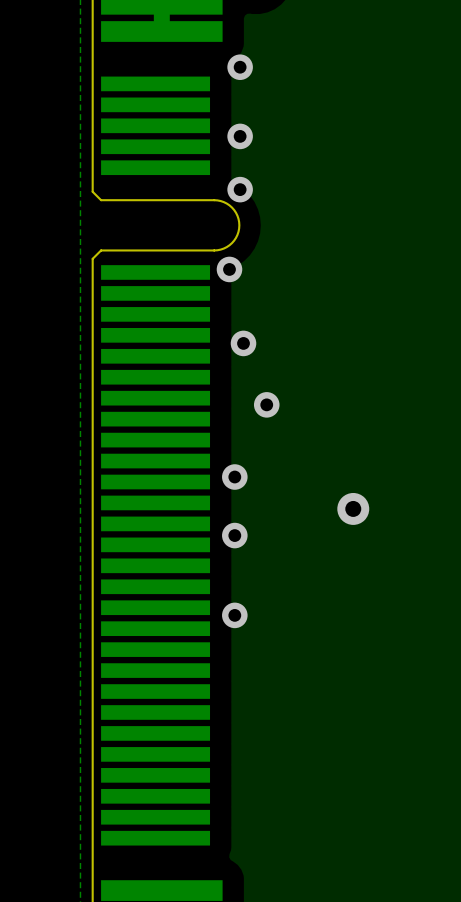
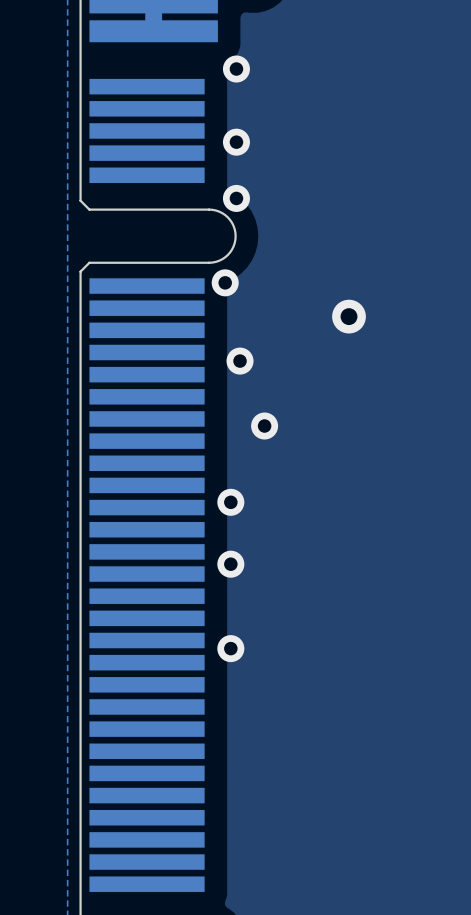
via: none -> (349, 316)
via: (353, 508) -> none

